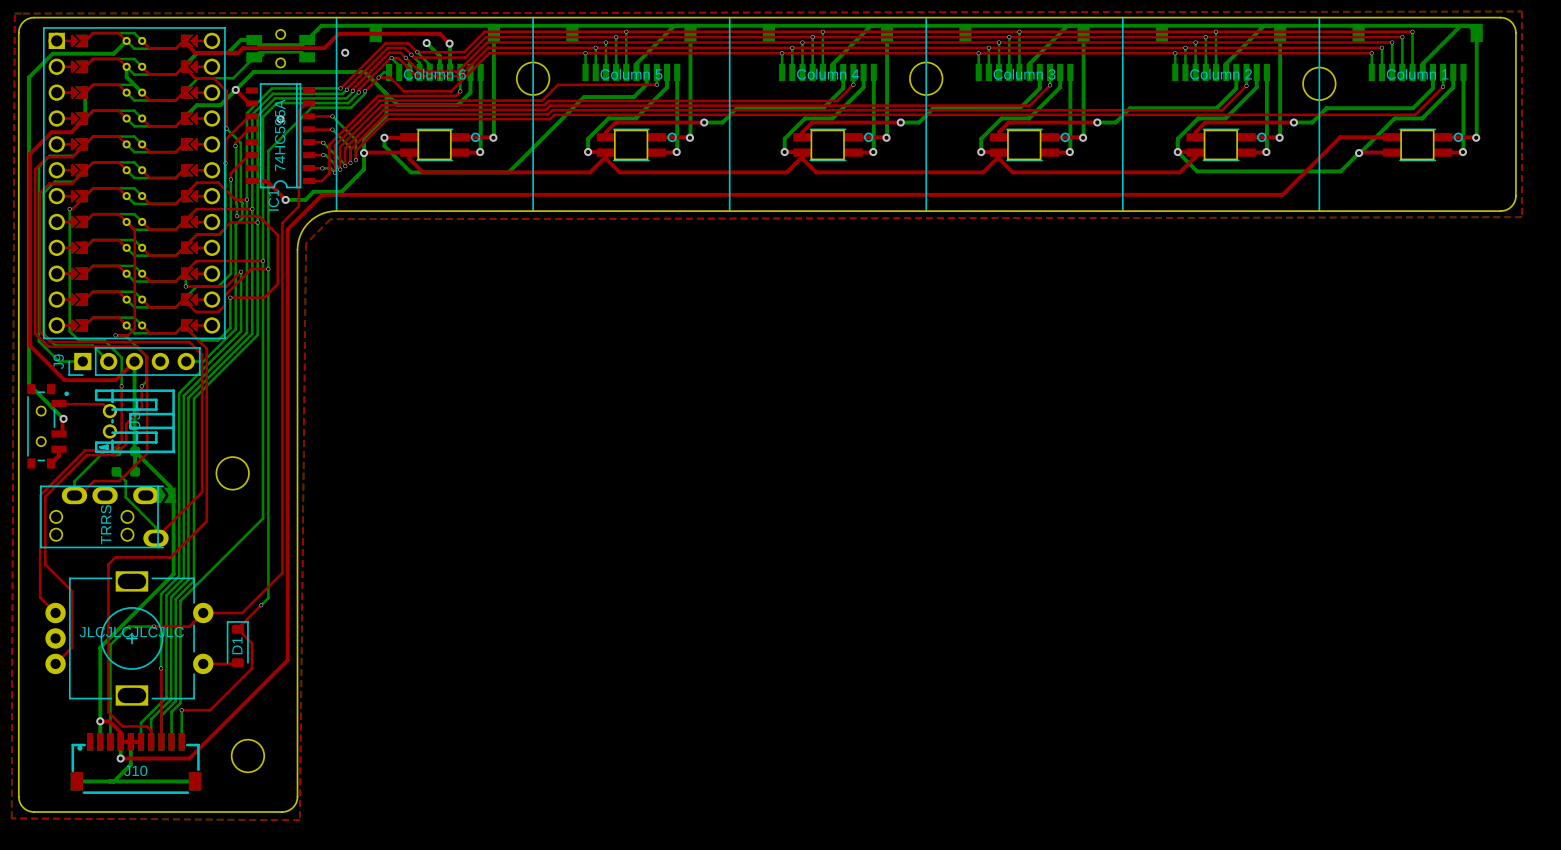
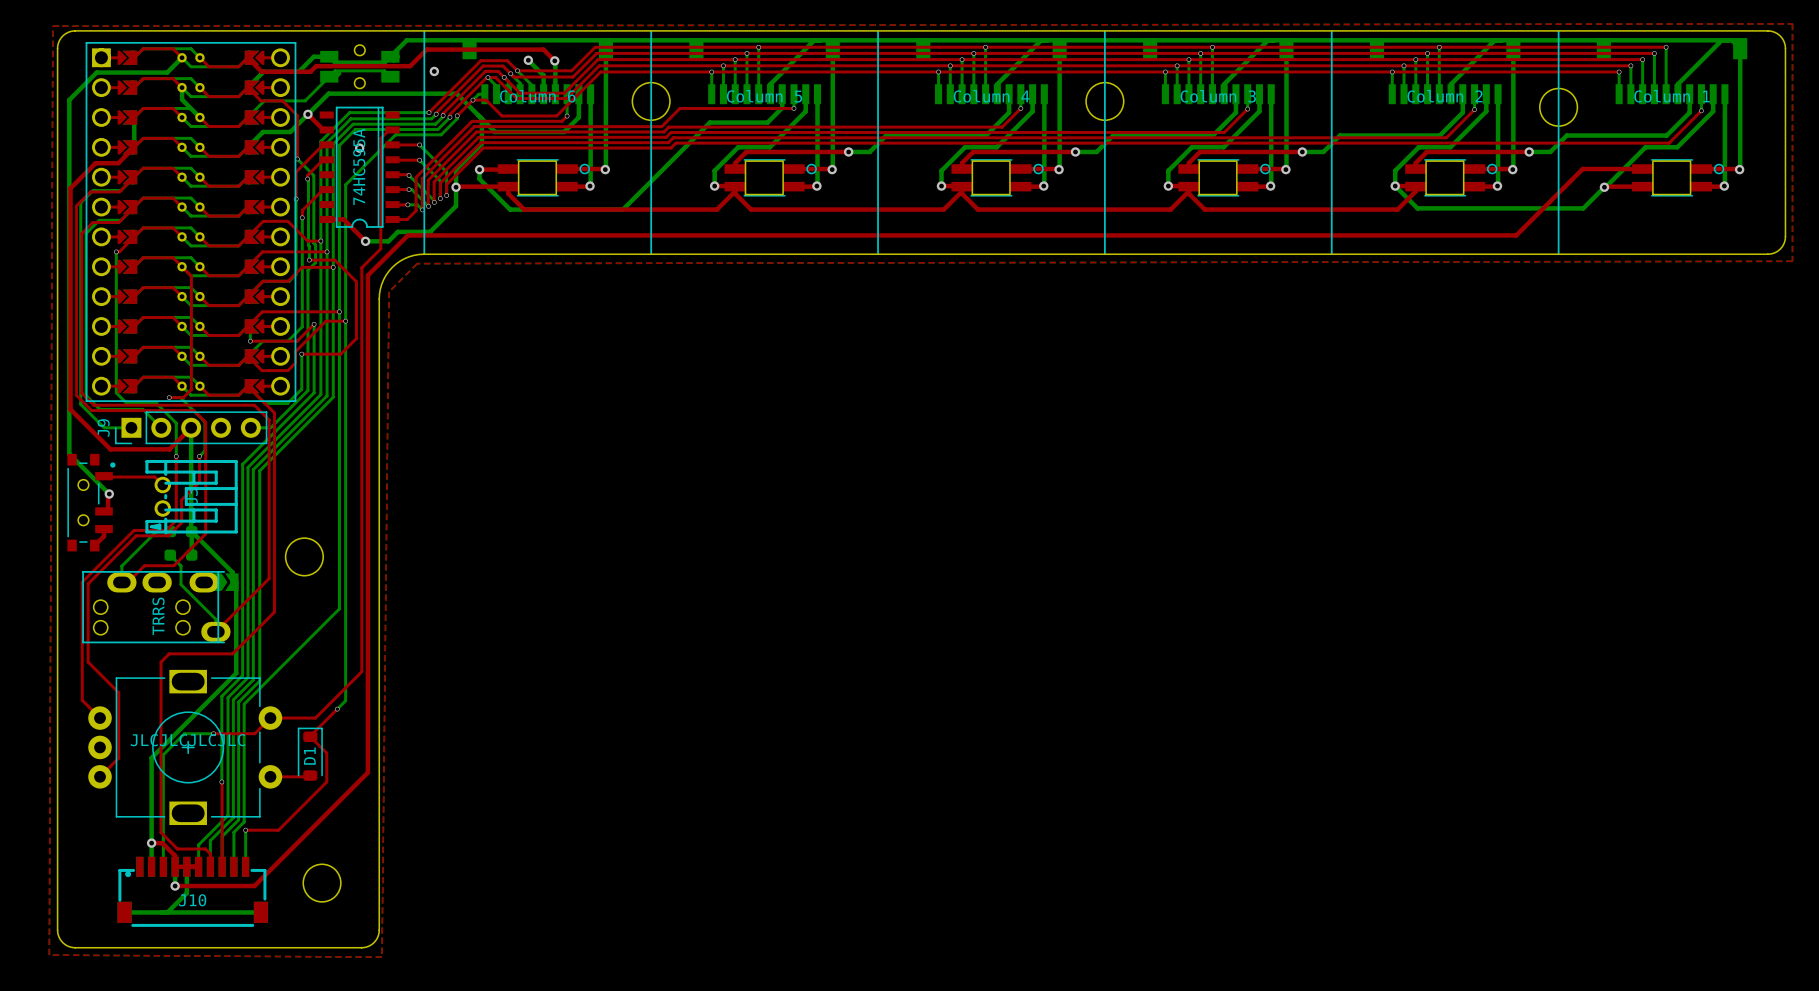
IC1 name: IC1 (273, 200) -> none

